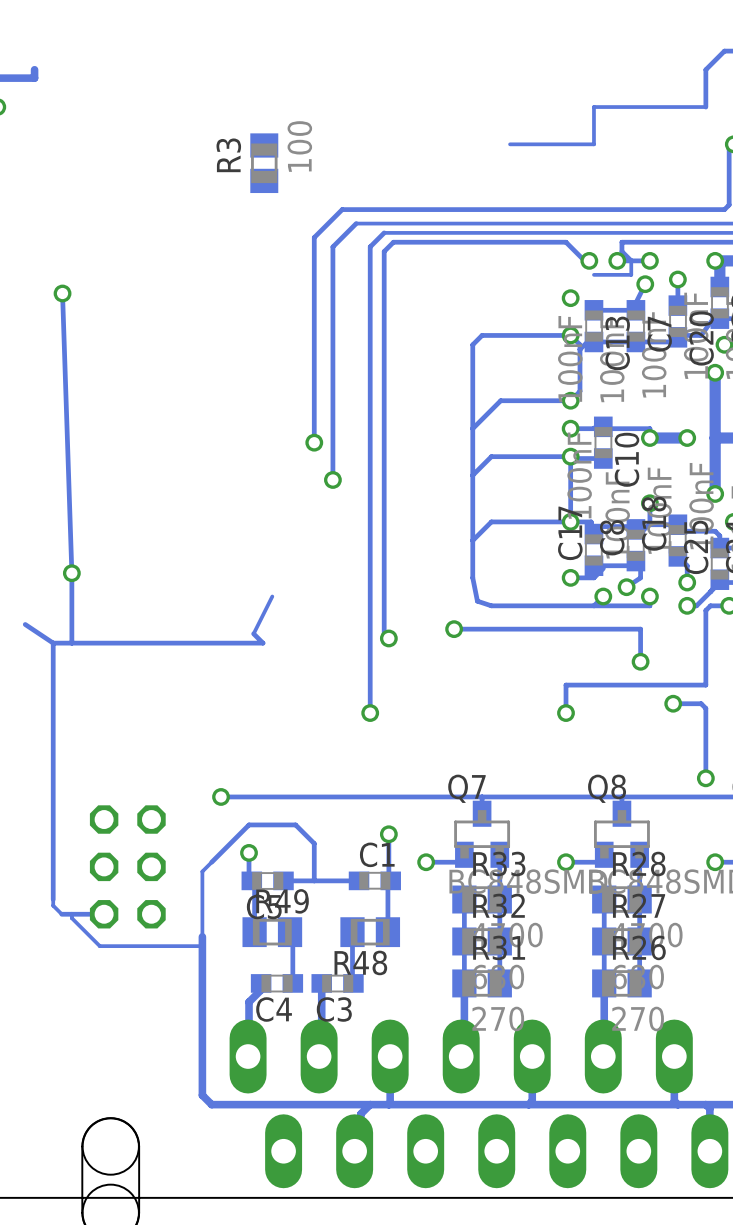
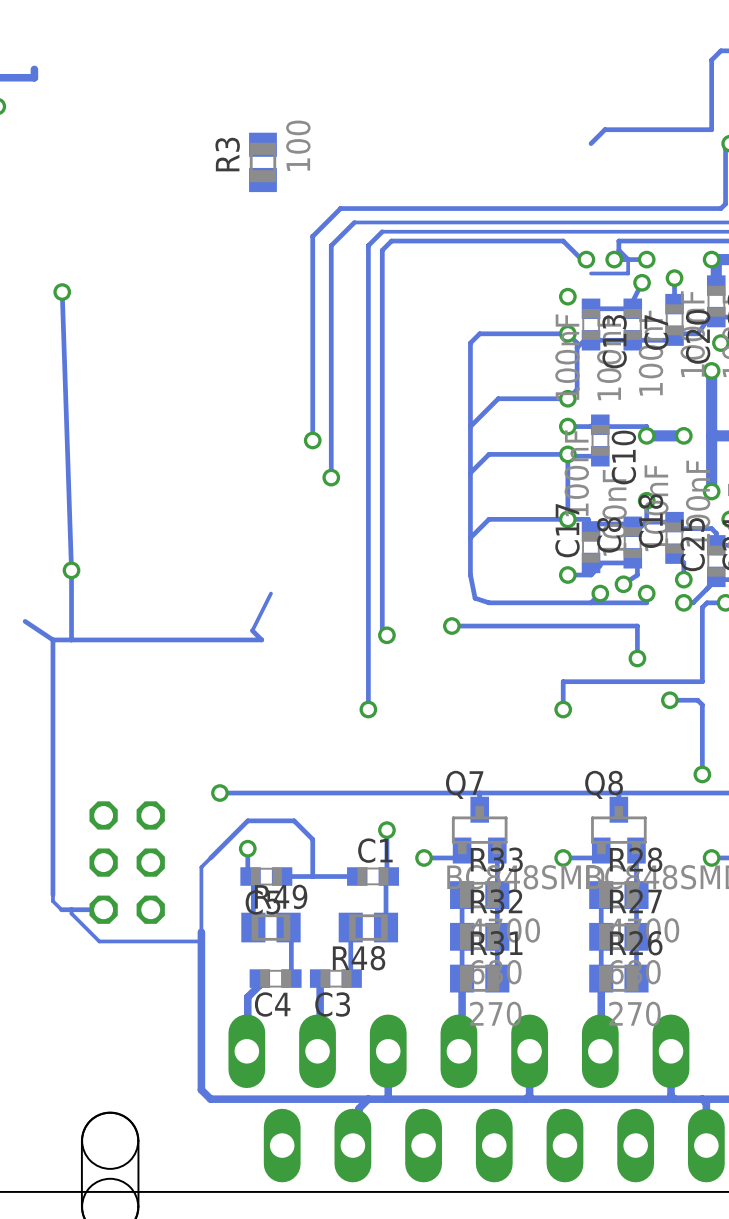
track: (715, 60) (705, 69) (705, 107) (593, 107) (593, 144) (510, 144) -> (711, 60) (711, 129) (604, 129) (591, 143)

